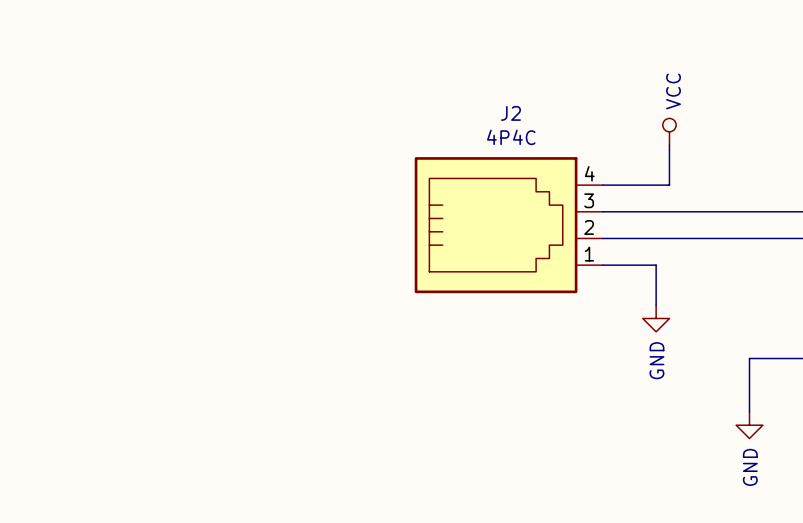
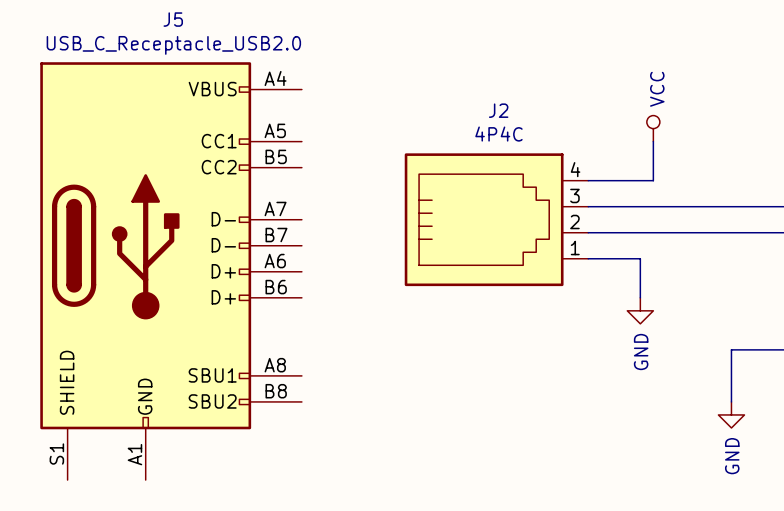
J5: none -> USB_C_Receptacle_USB2.0 (171, 271)

